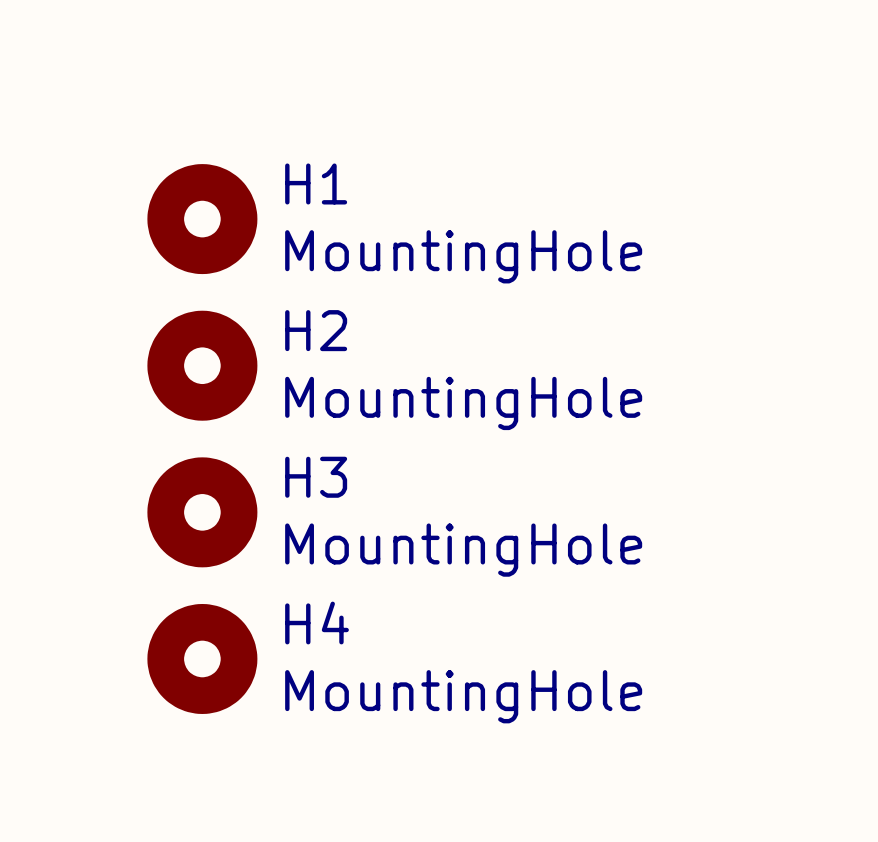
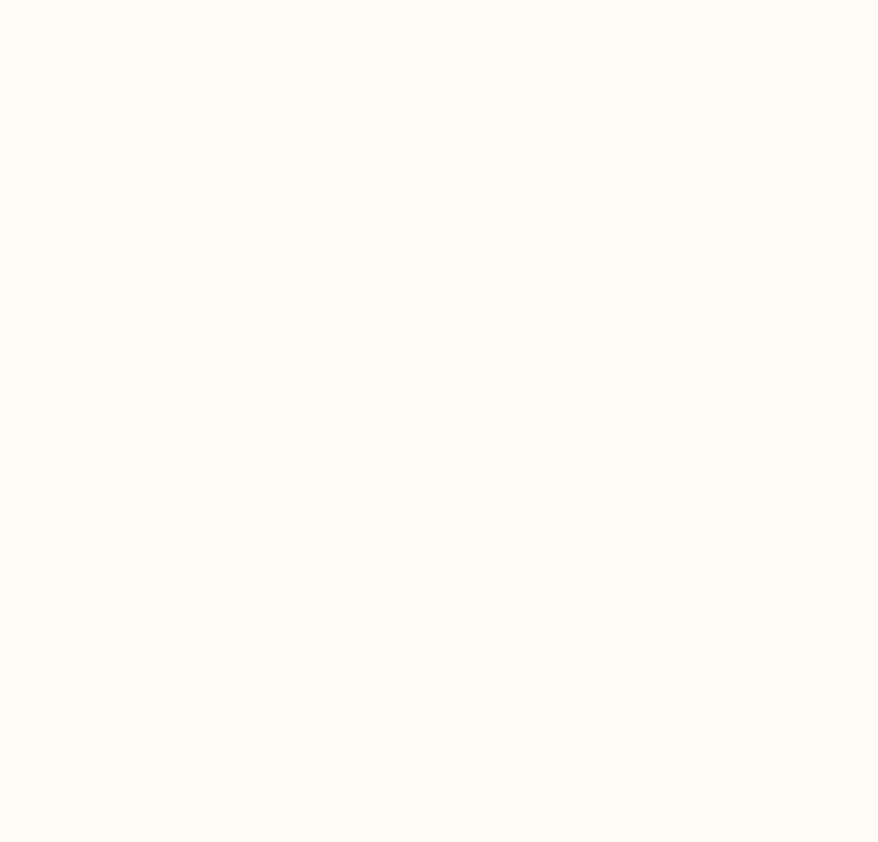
H1: MountingHole (202, 219) -> none
H2: MountingHole (202, 365) -> none
H3: MountingHole (202, 512) -> none
H4: MountingHole (202, 658) -> none

